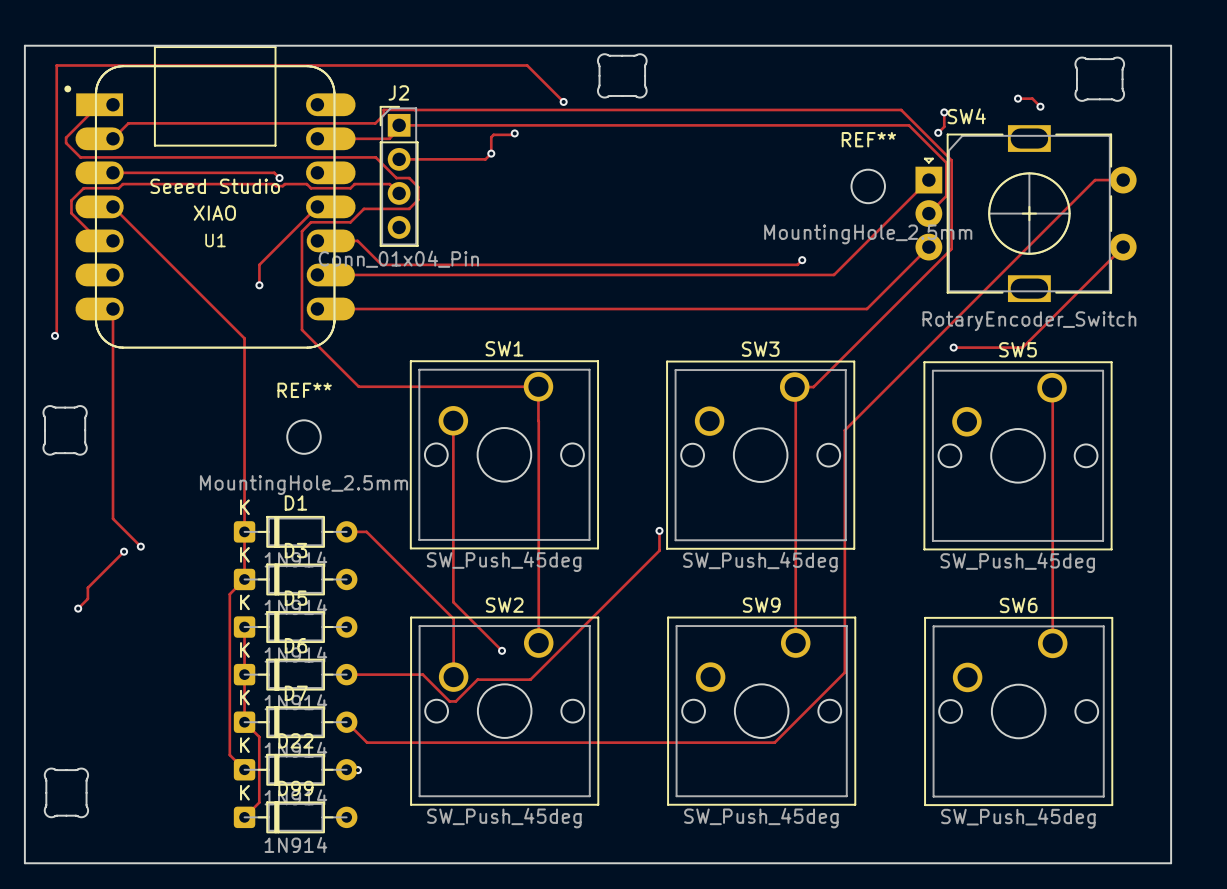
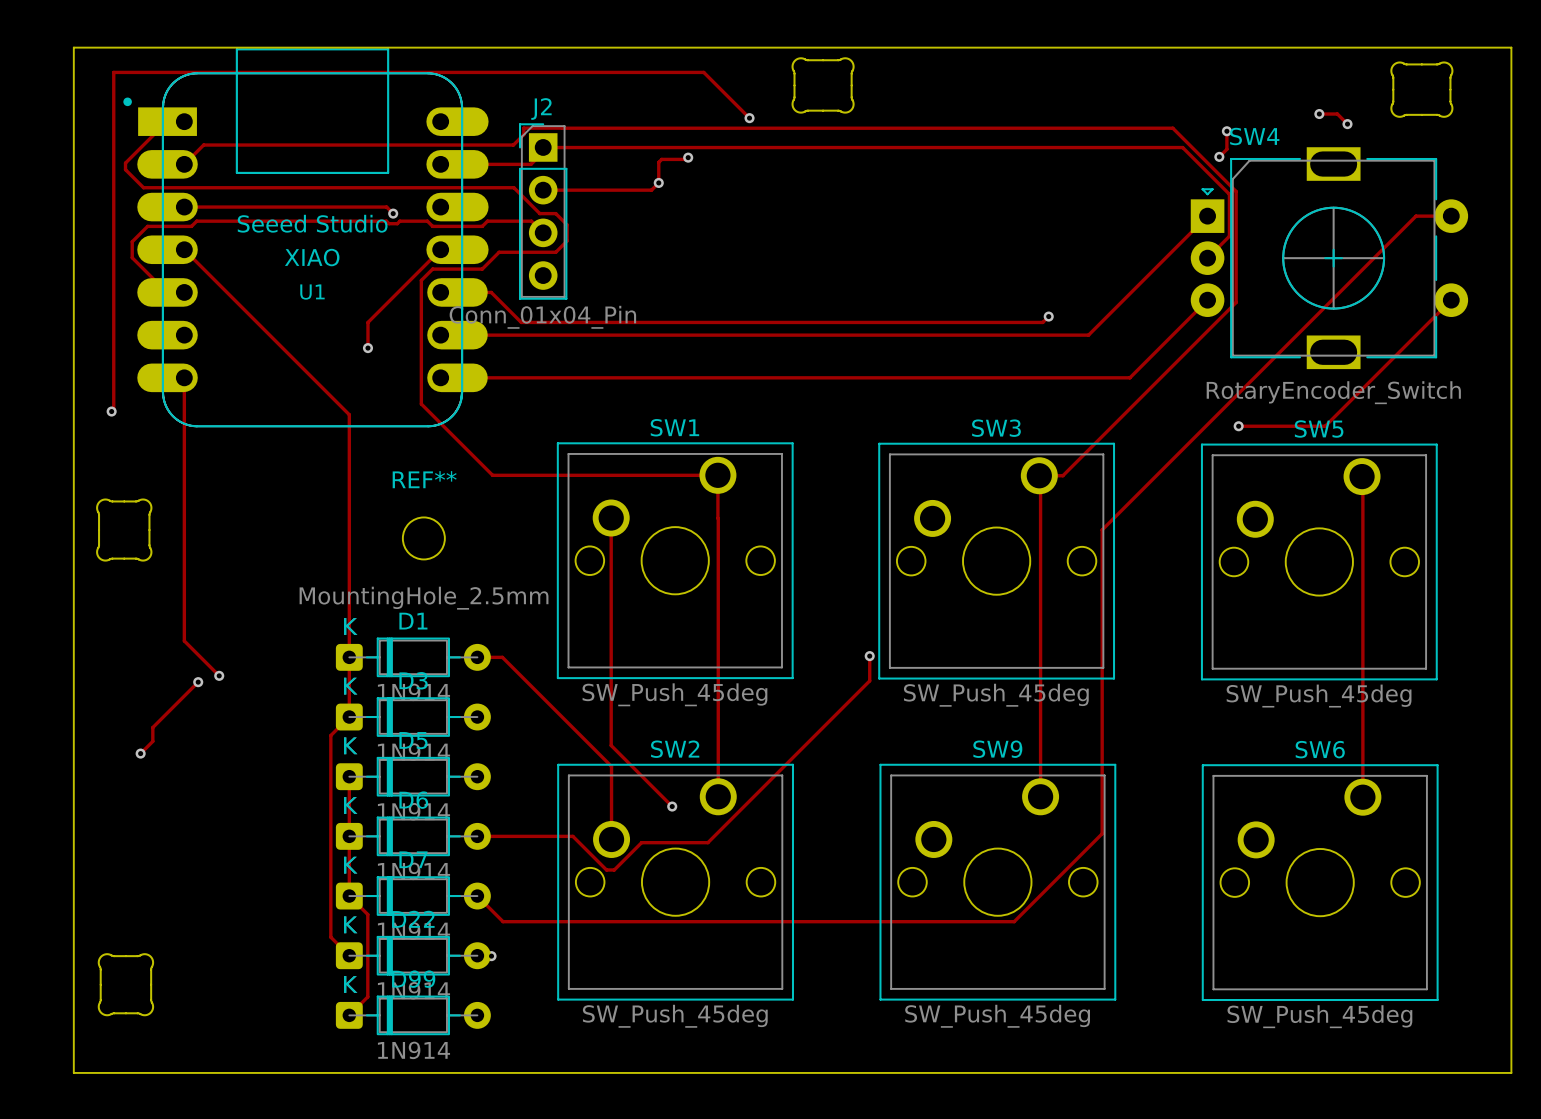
REF**: MountingHole_2.5mm (868, 186) -> none

